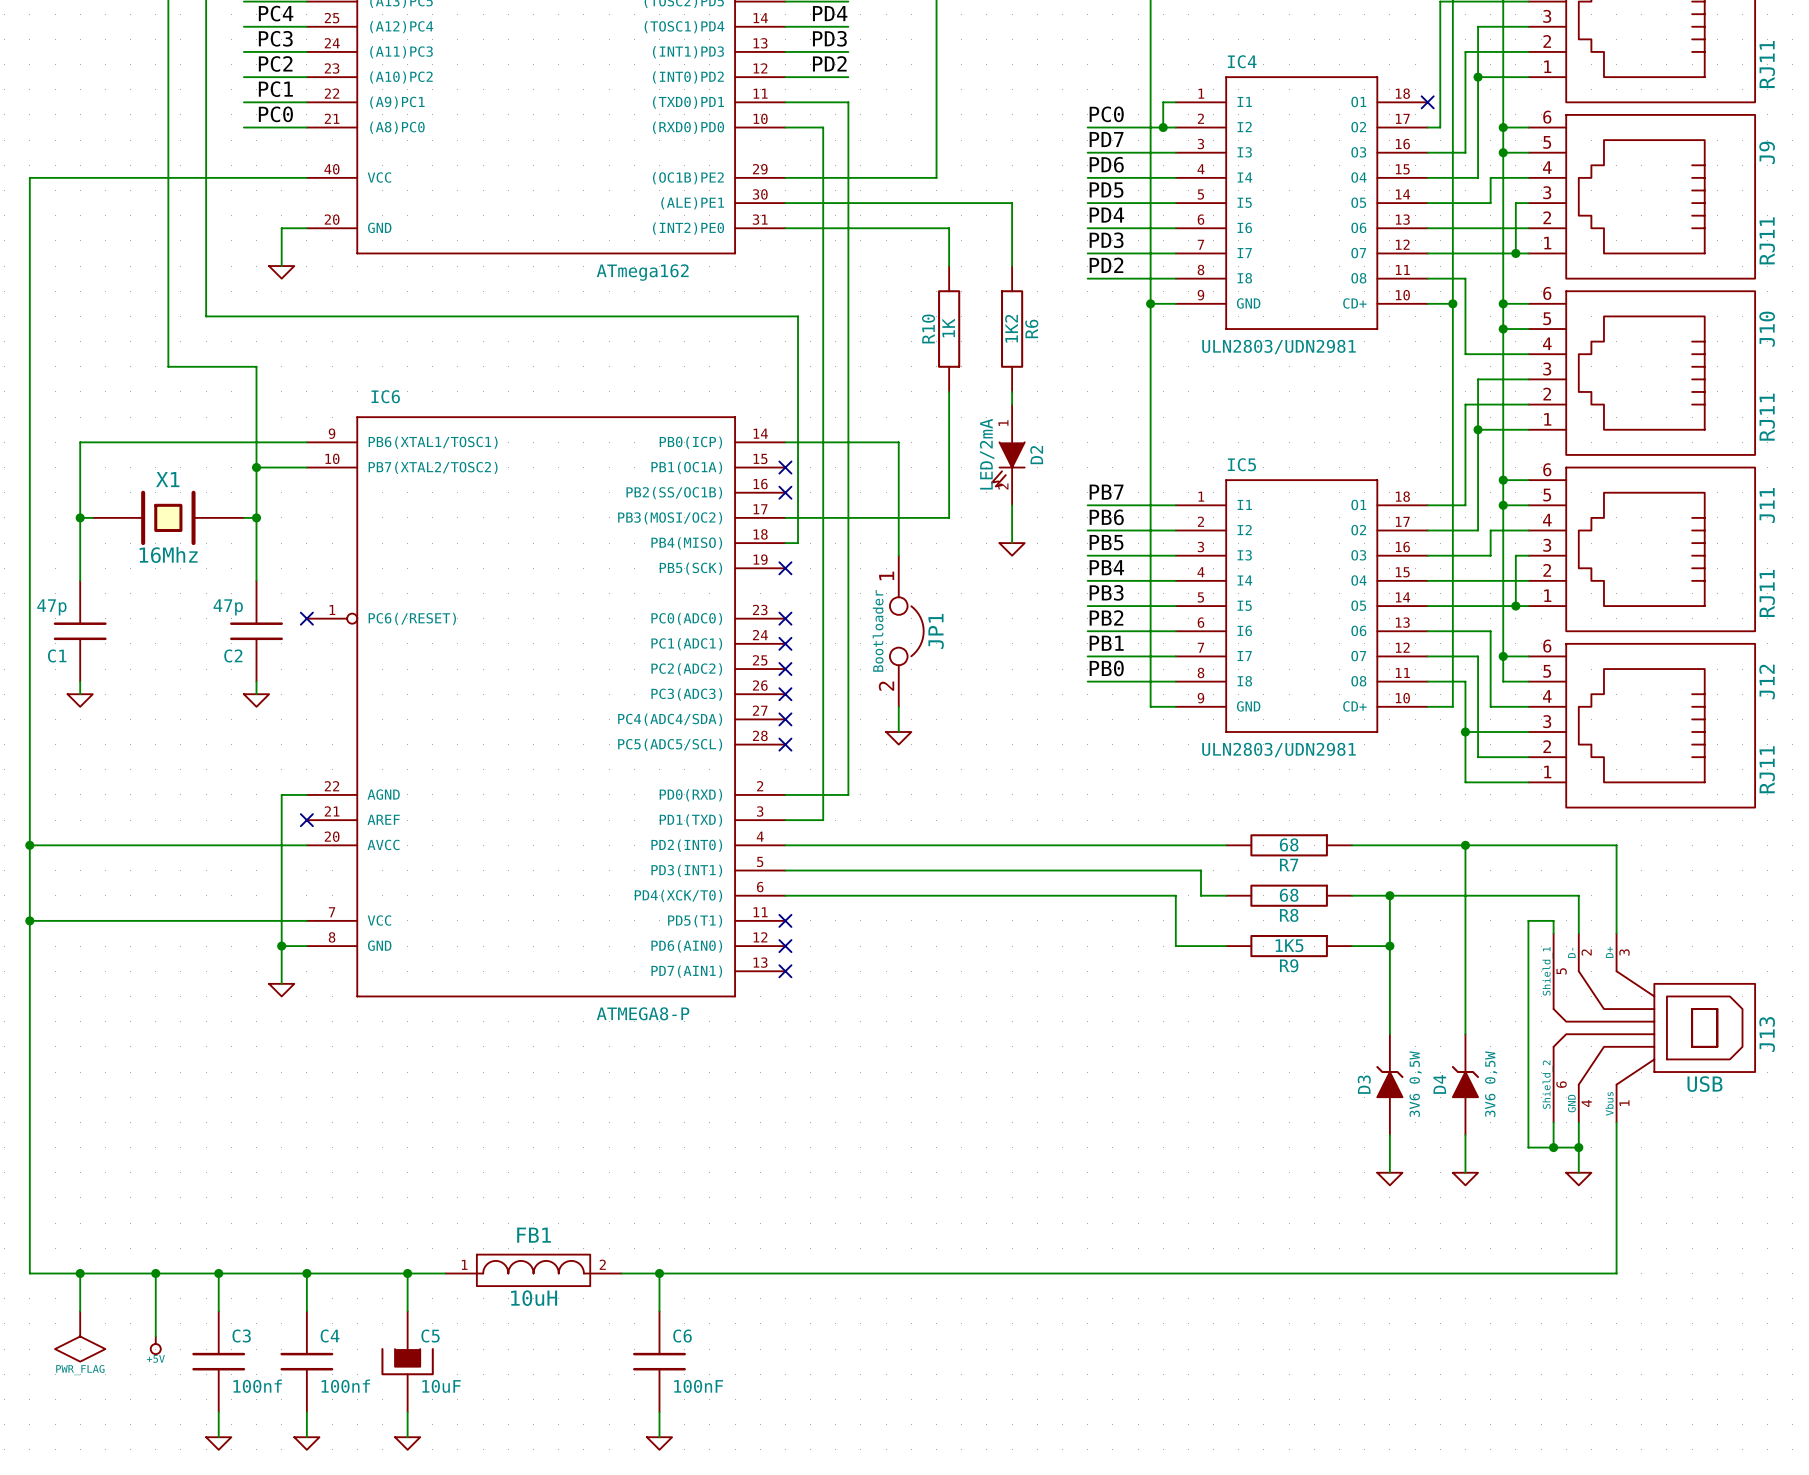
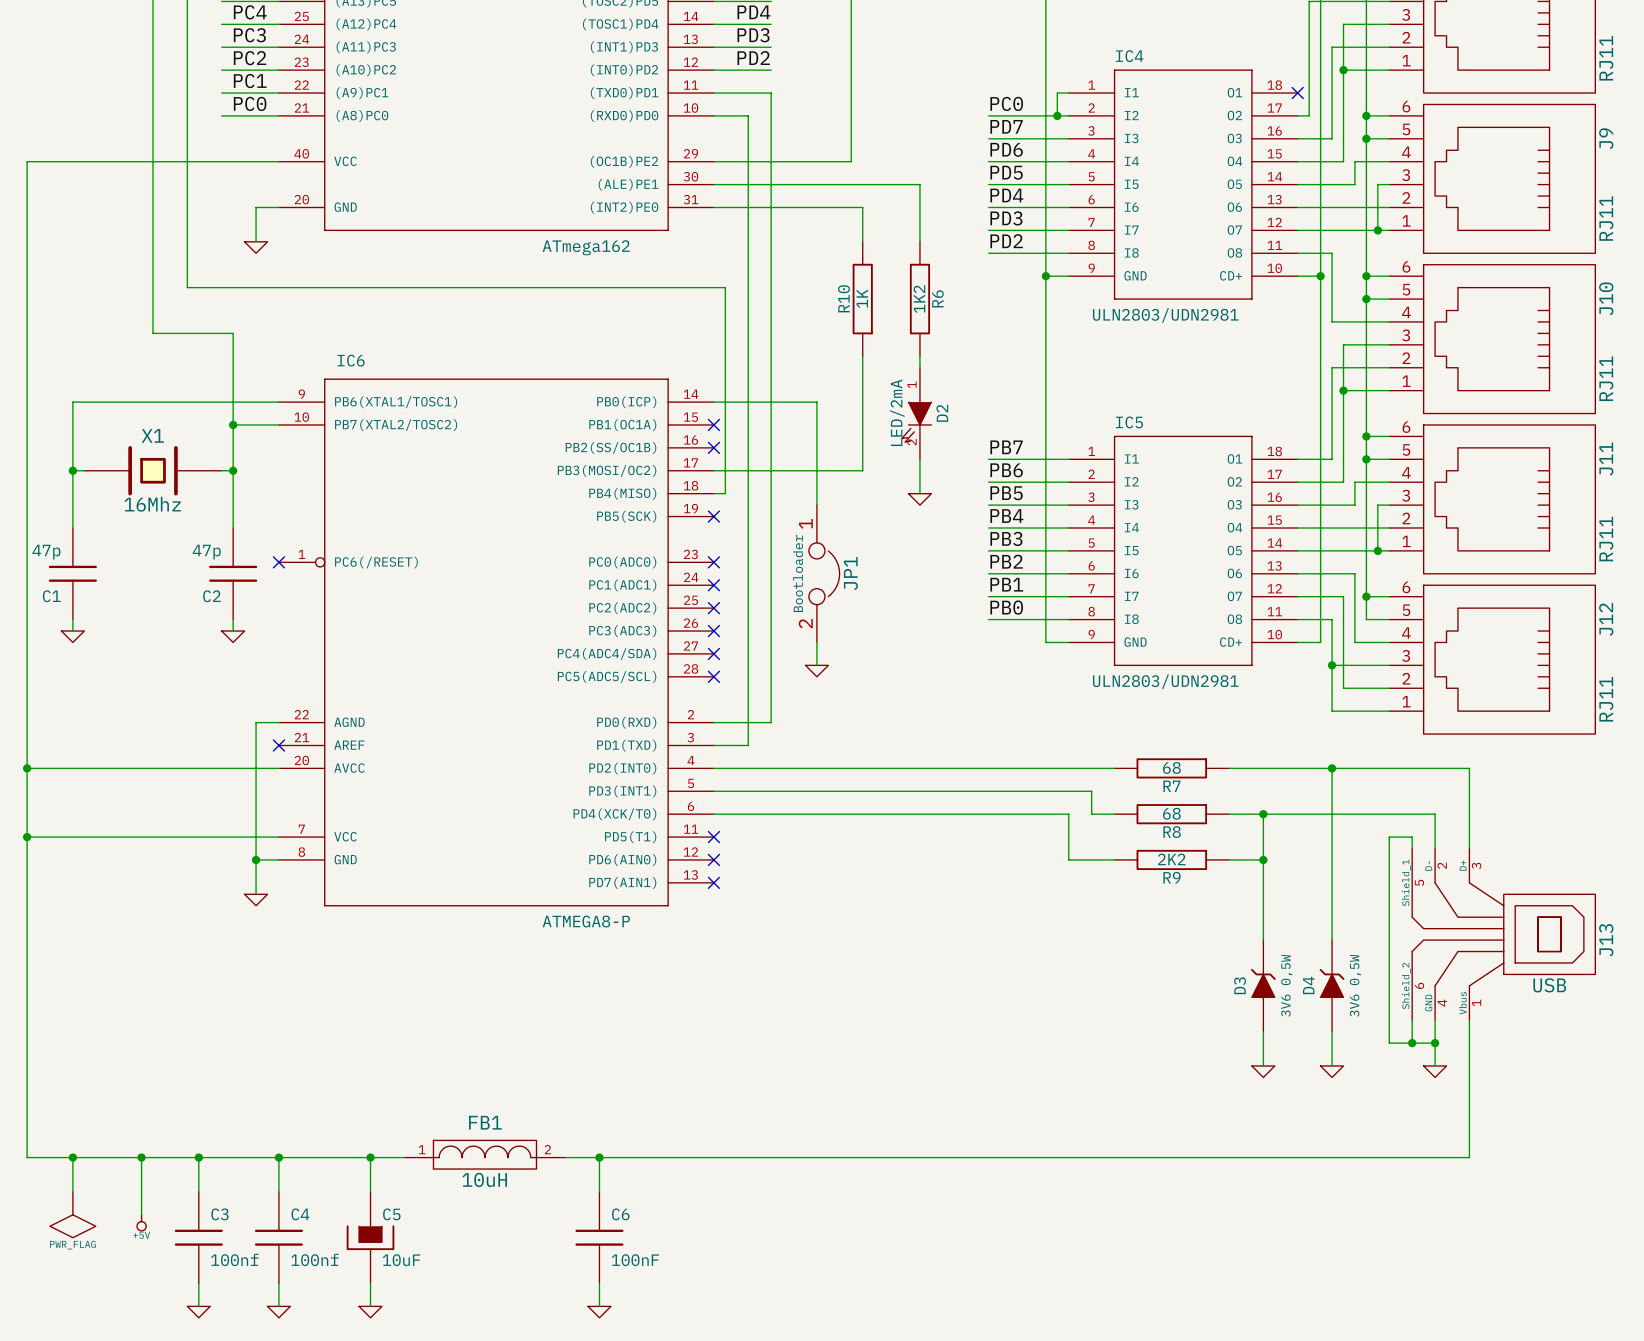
R9 value: 1K5 (1289, 945) -> 2K2 (1171, 859)

